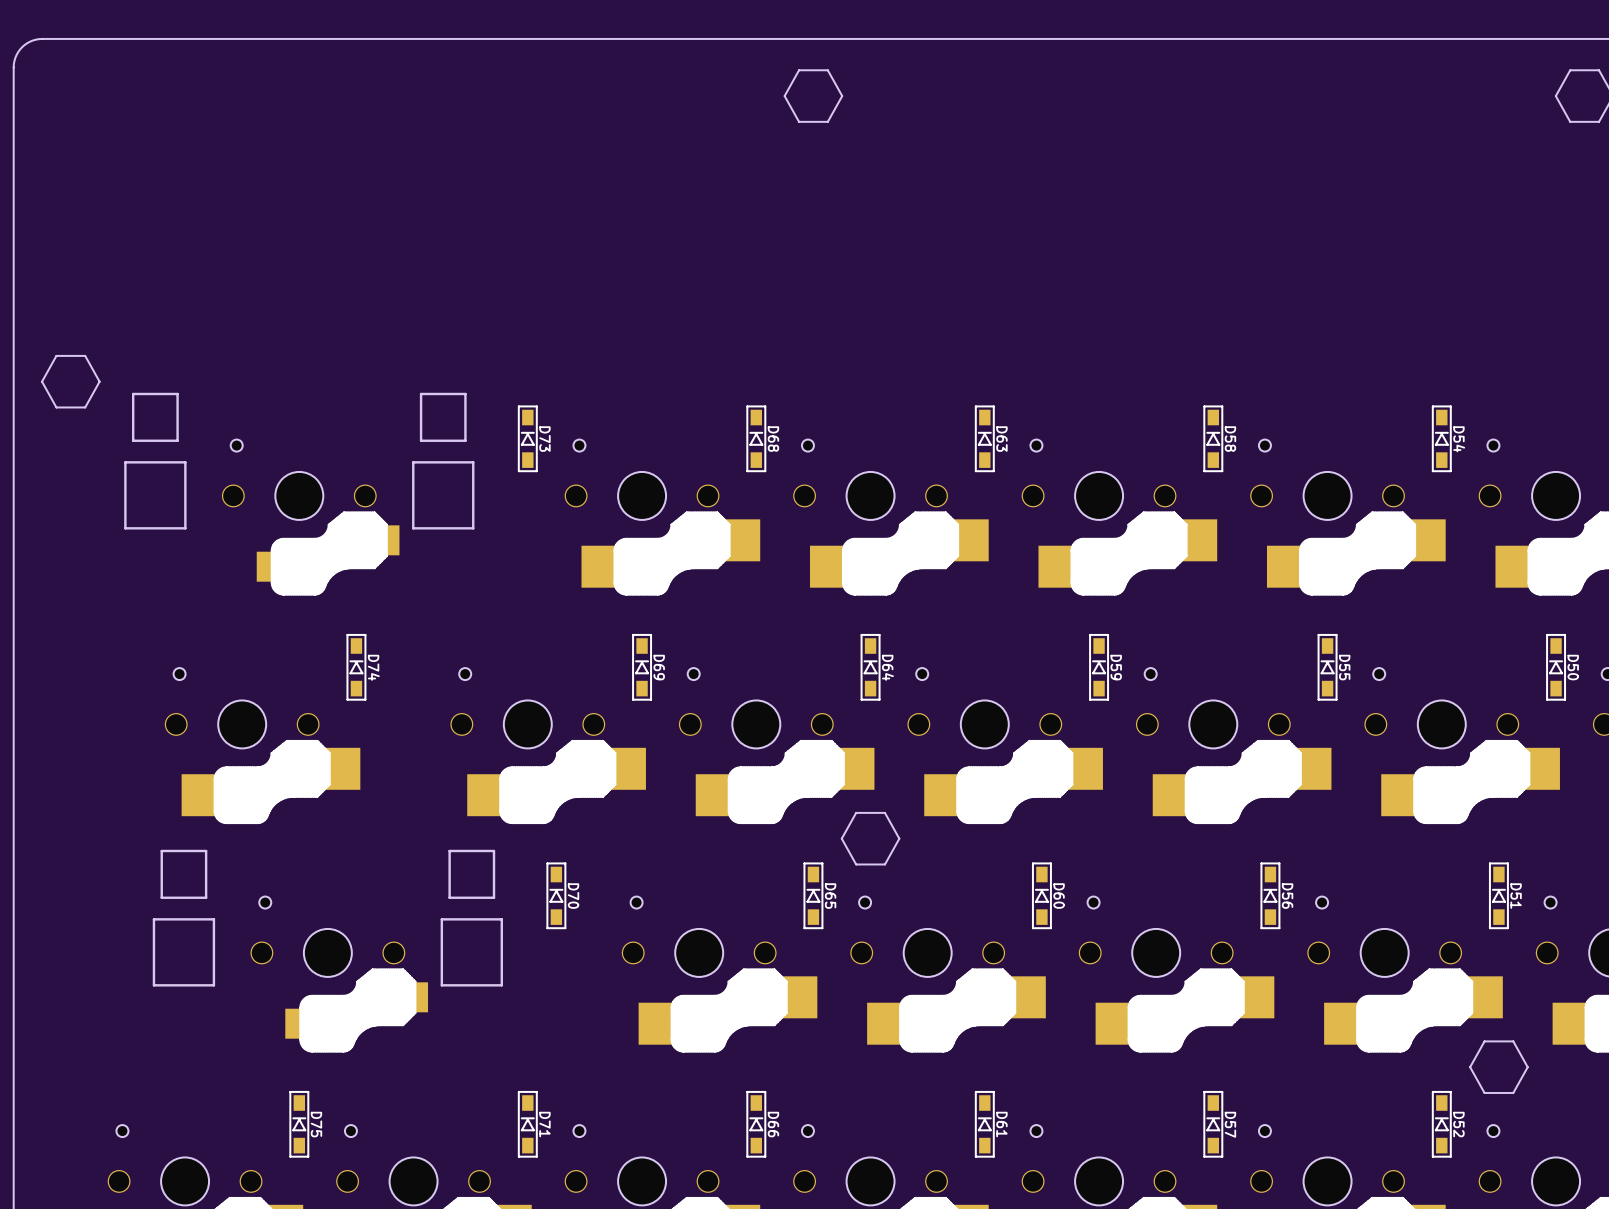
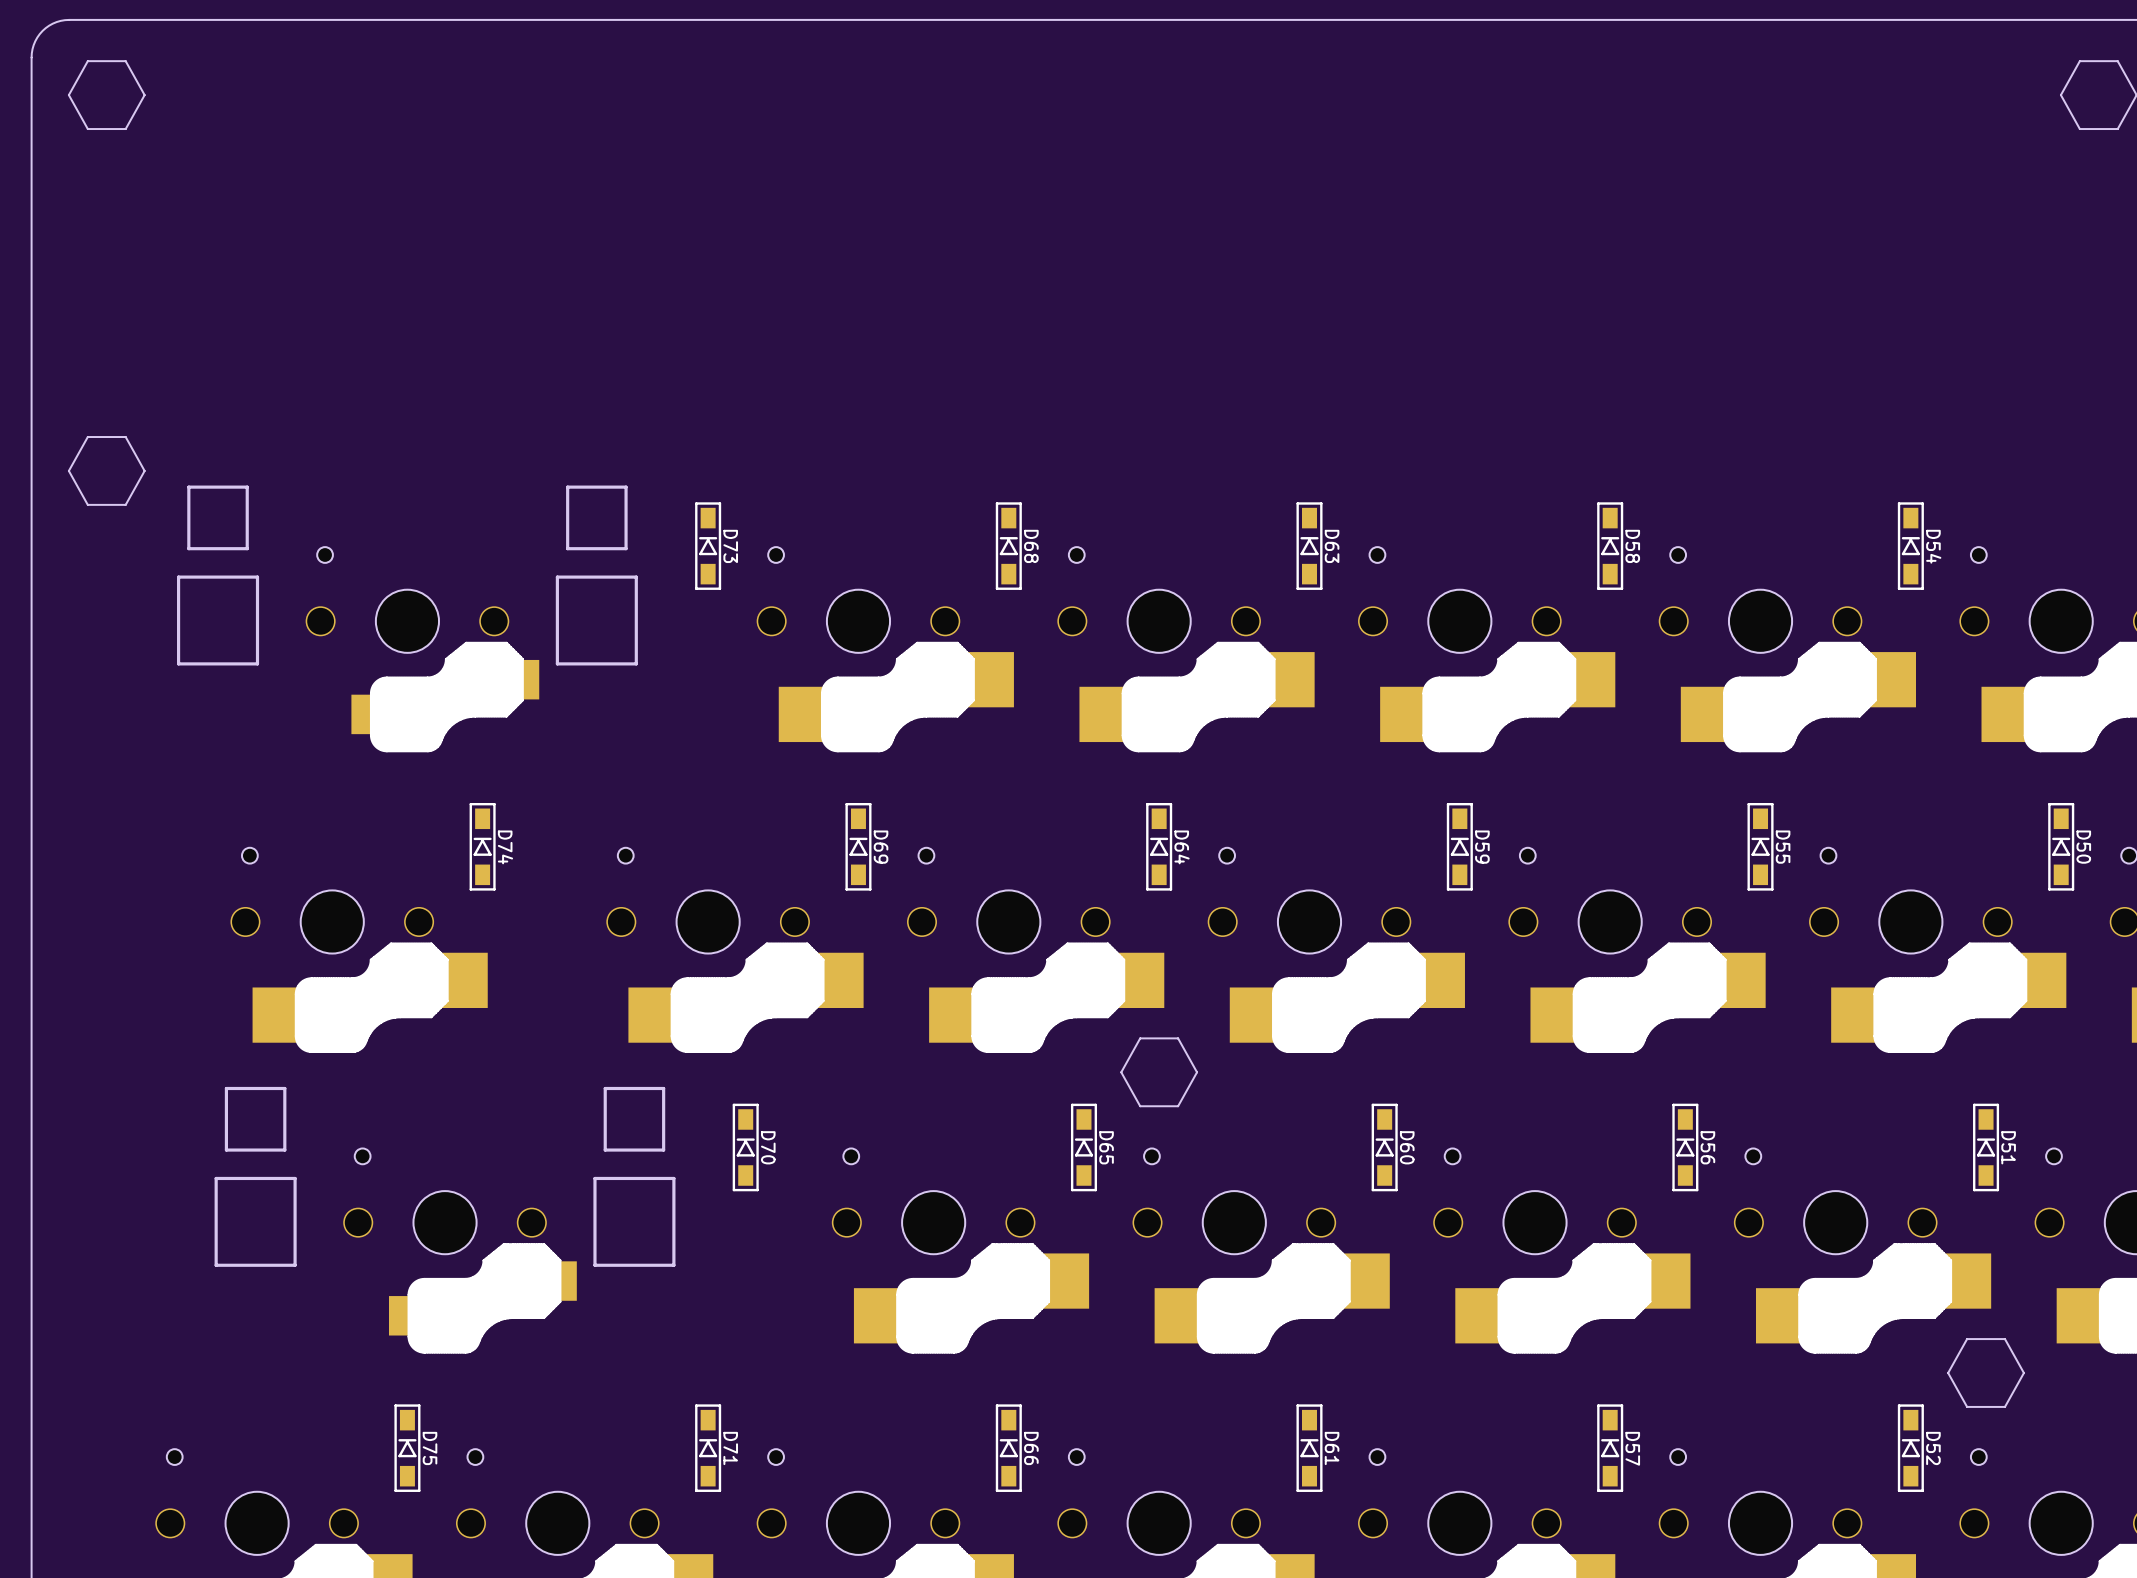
drawing: none -> [68, 60, 146, 130]
drawing: [784, 69, 843, 123] -> none

